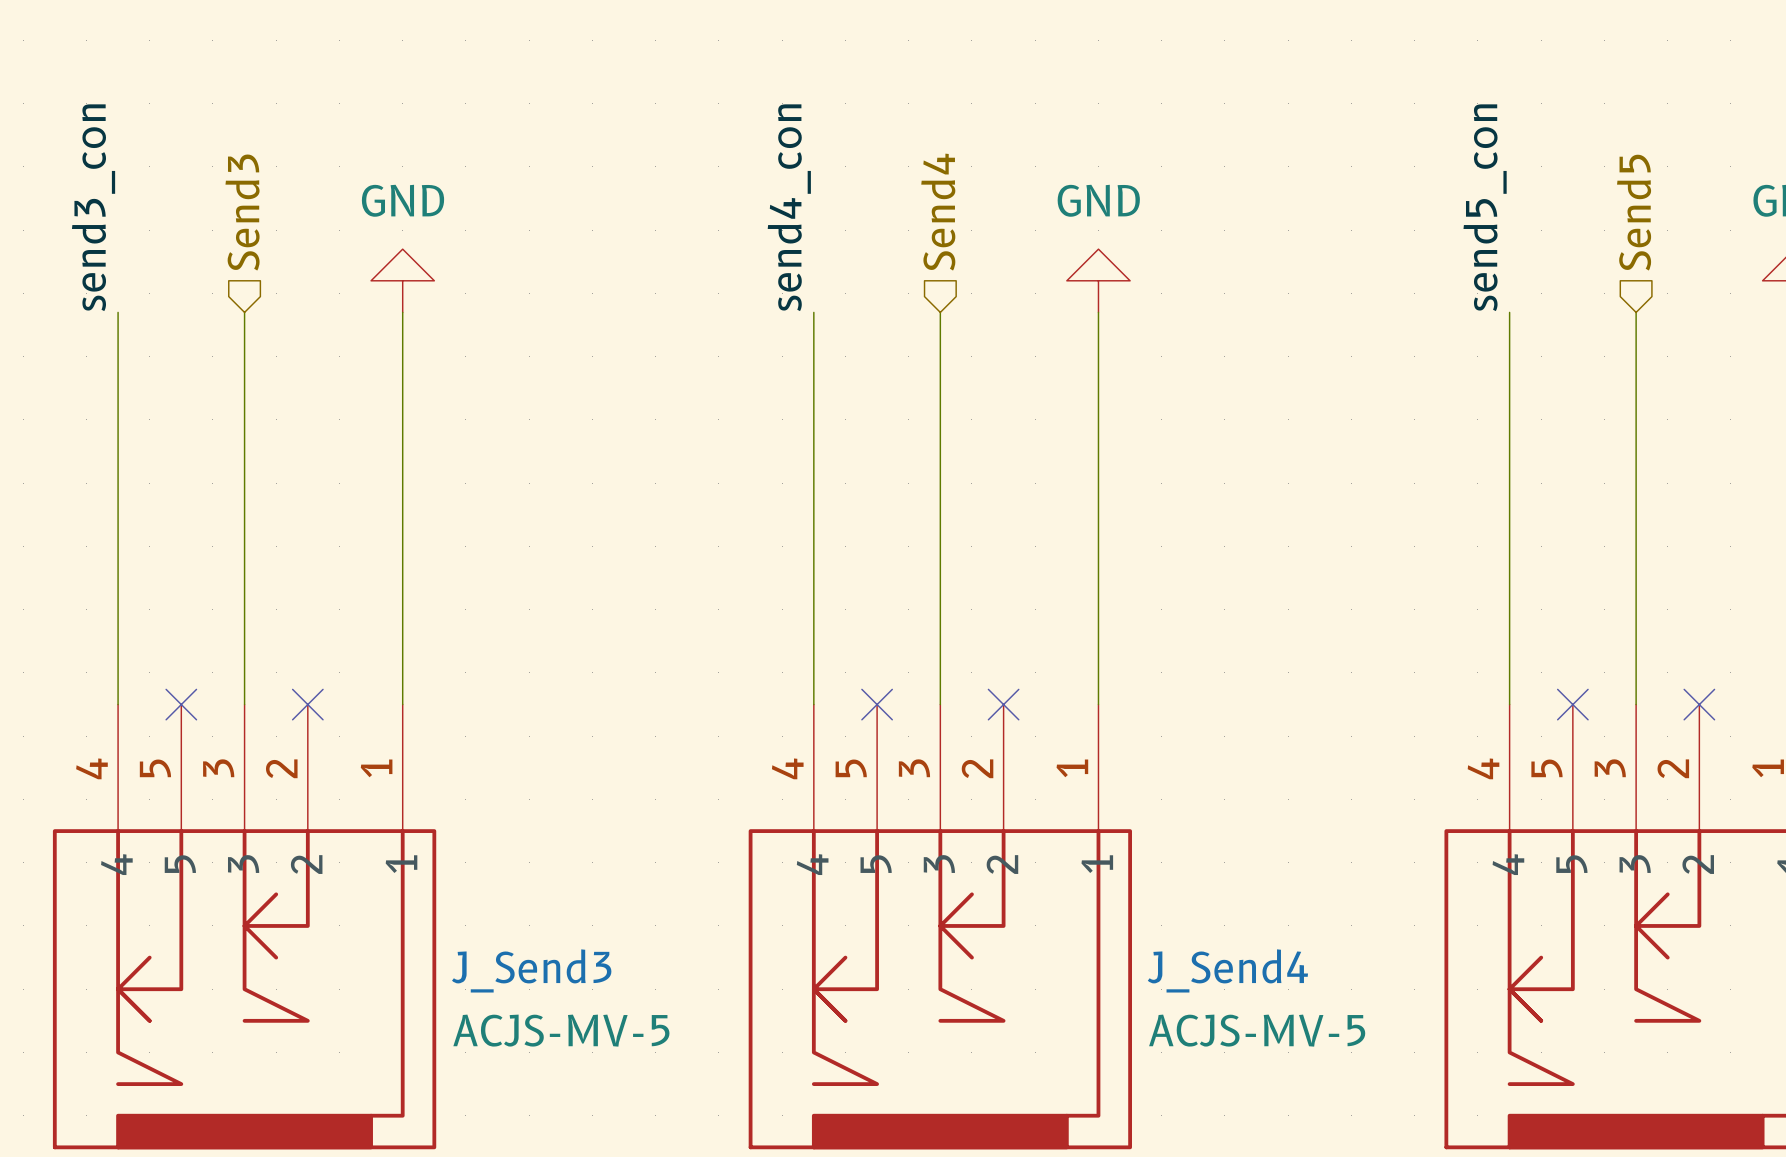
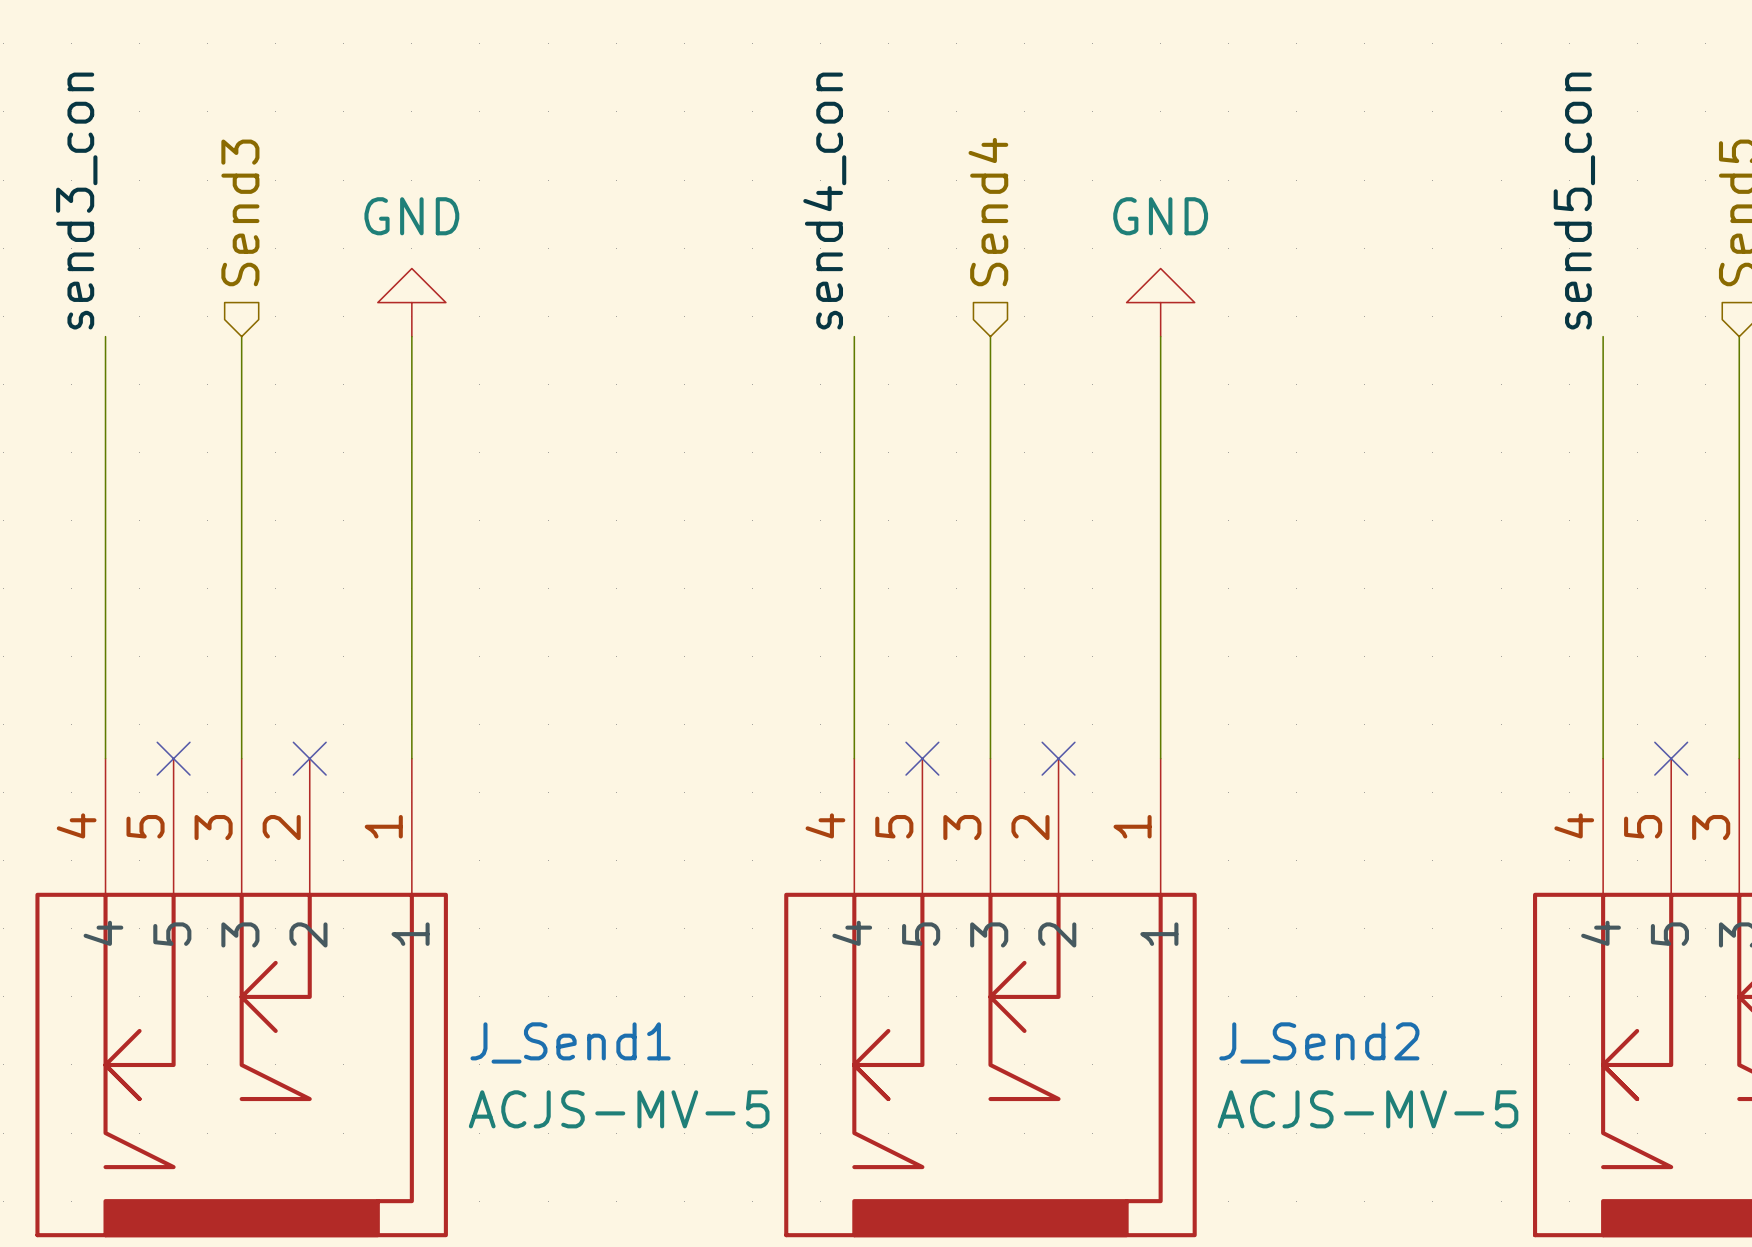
J_Send3 name: J_Send3 (531, 970) -> J_Send1 (570, 1042)
J_Send4 name: J_Send4 (1227, 970) -> J_Send2 (1319, 1042)

